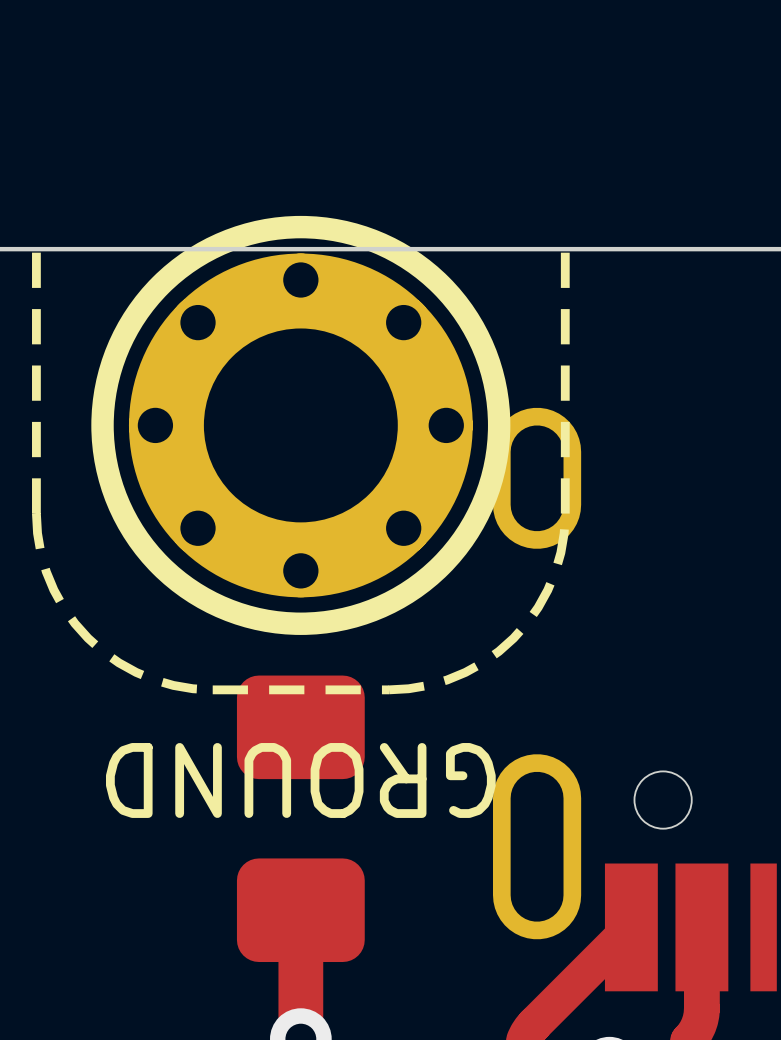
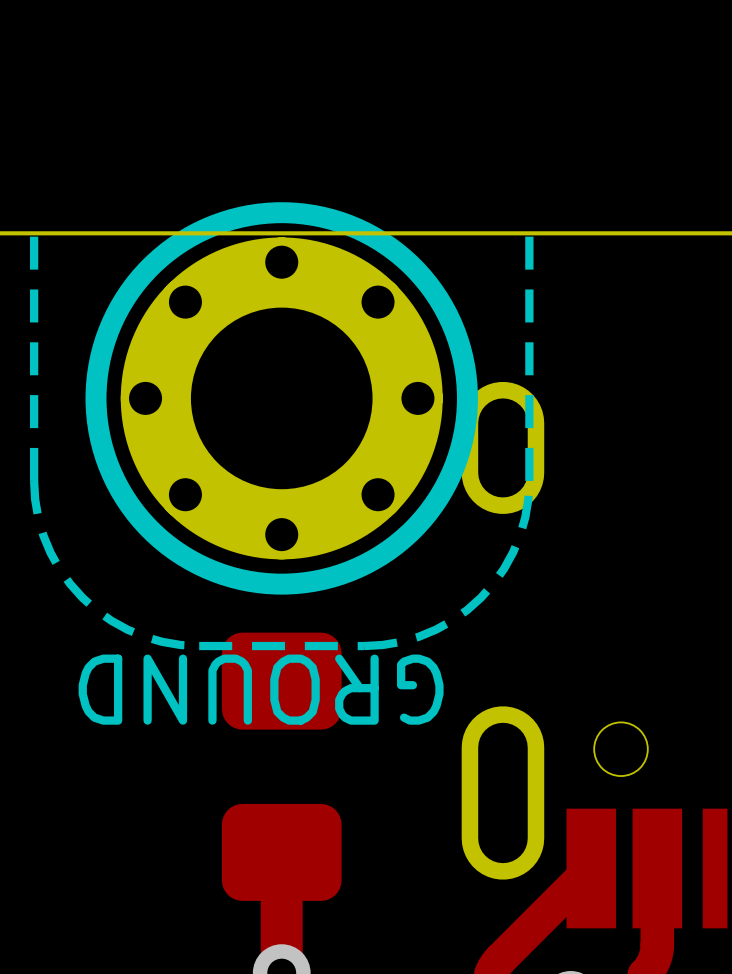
text position: GROUND (300, 780) -> GROUND (261, 689)

